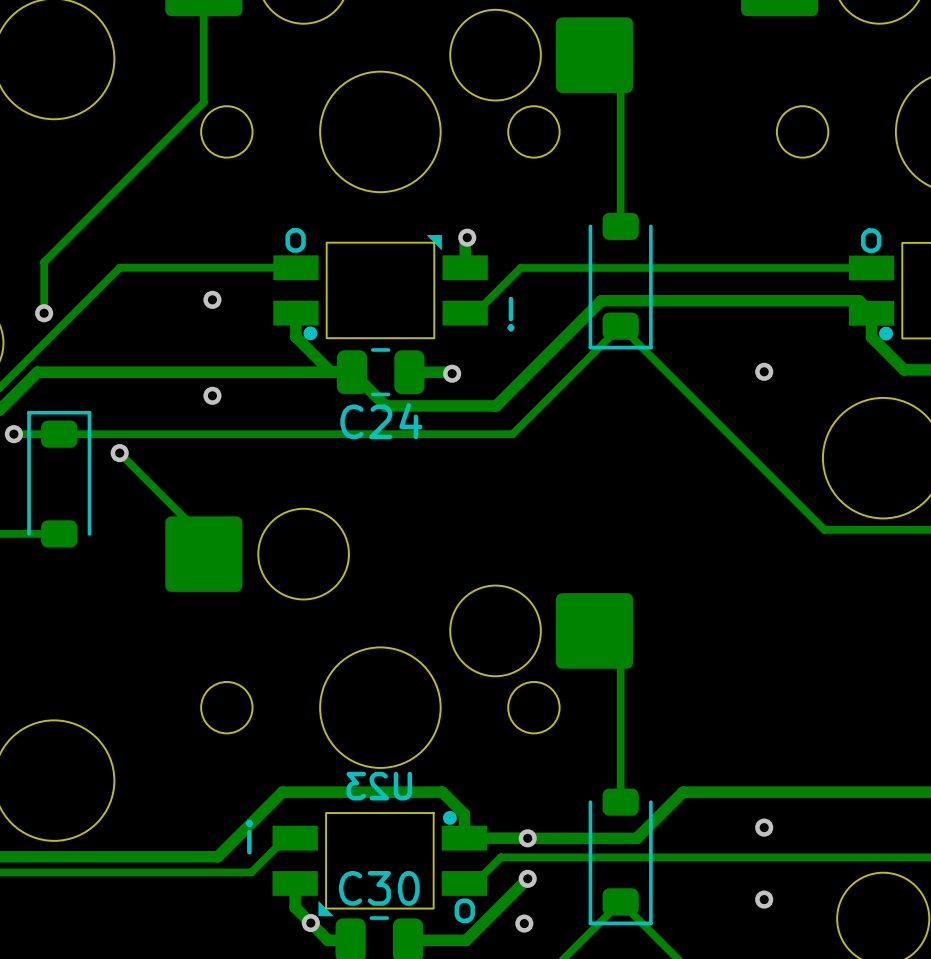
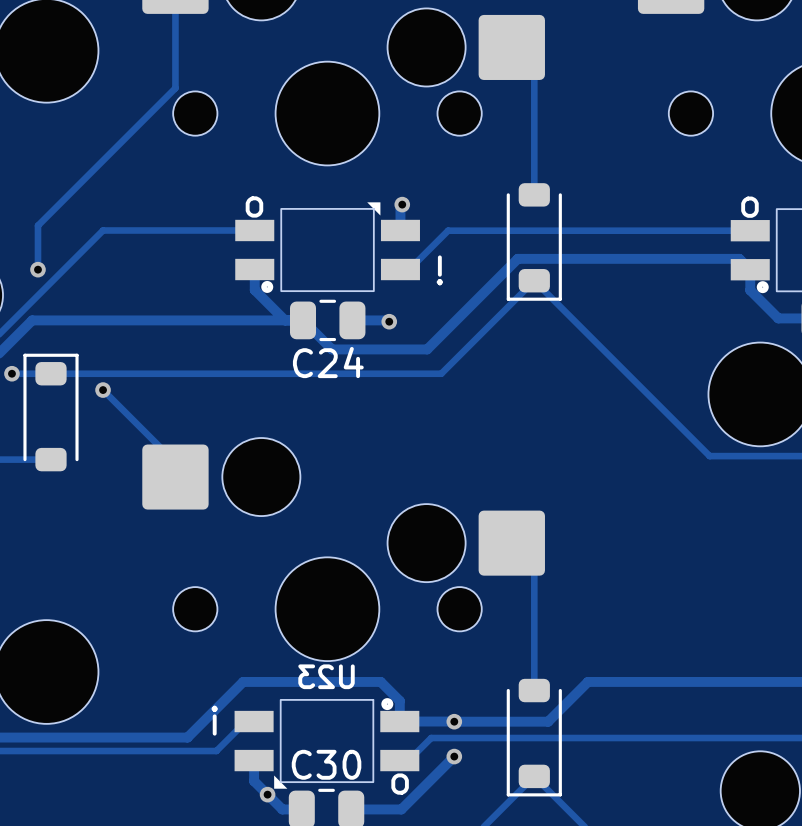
via: (212, 299) -> none
via: (764, 371) -> none
via: (212, 395) -> none
via: (764, 827) -> none
via: (764, 899) -> none
via: (524, 923) -> none

